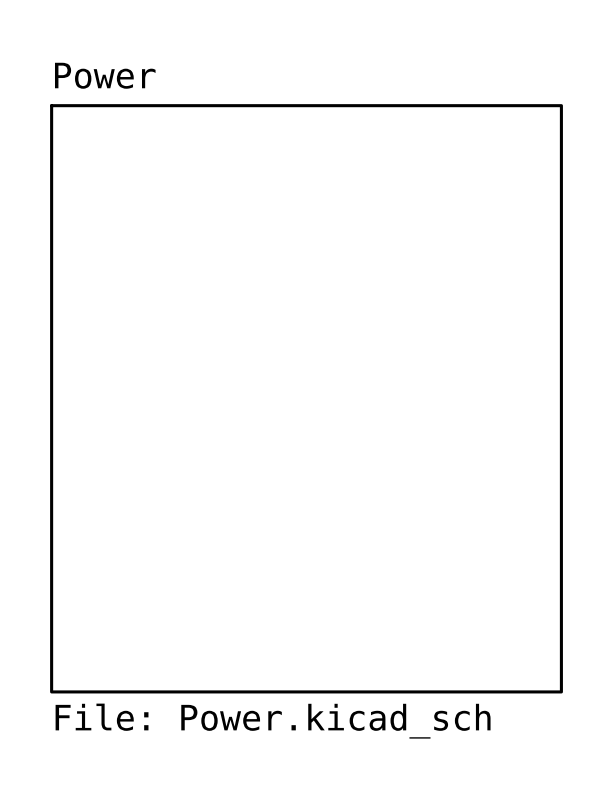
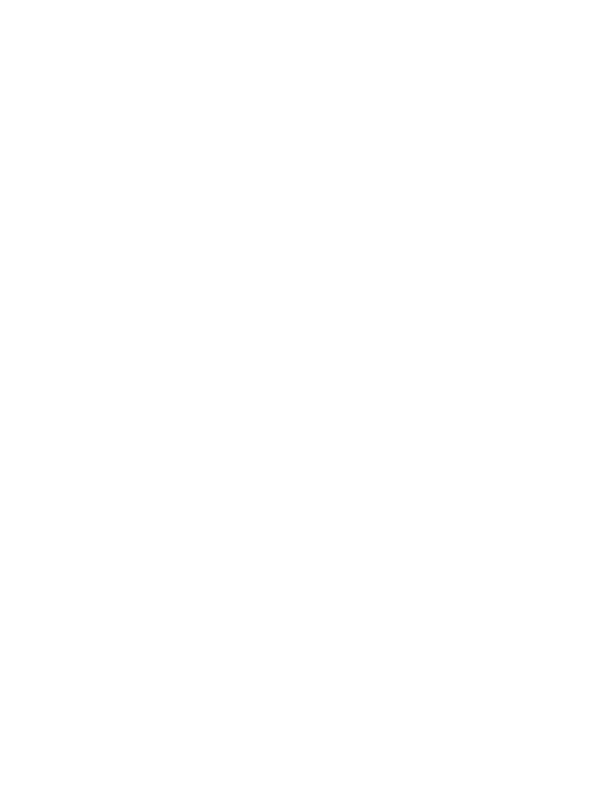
sheet Power: File: Power.kicad_sch (306, 398) -> none

